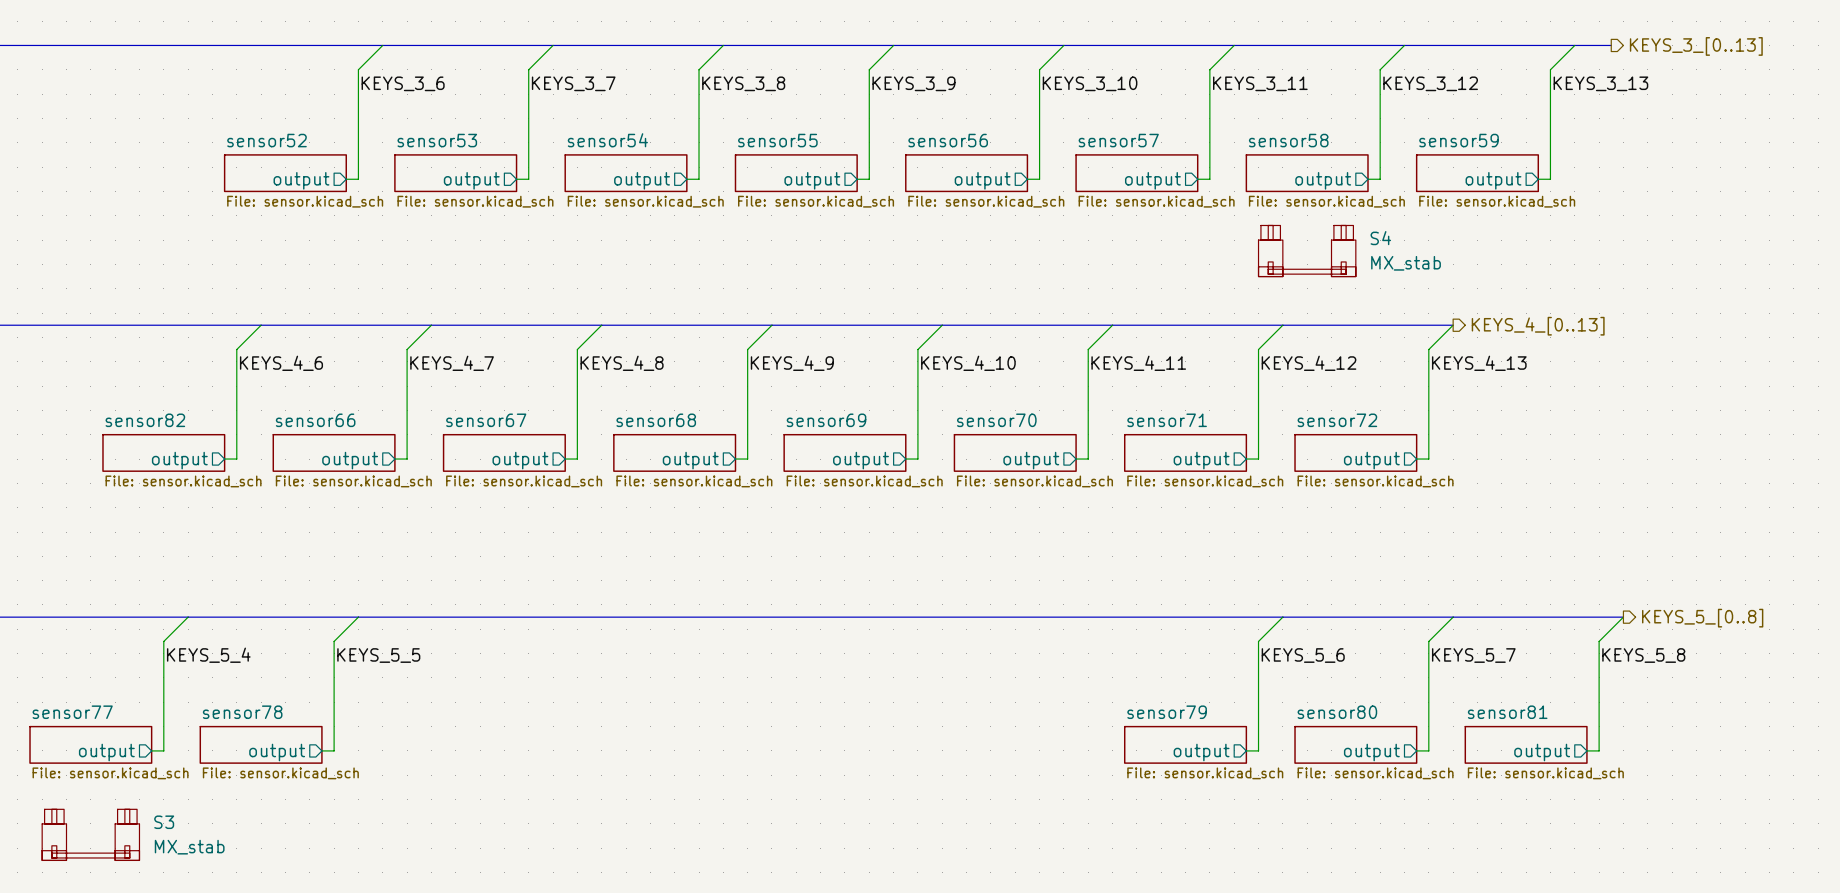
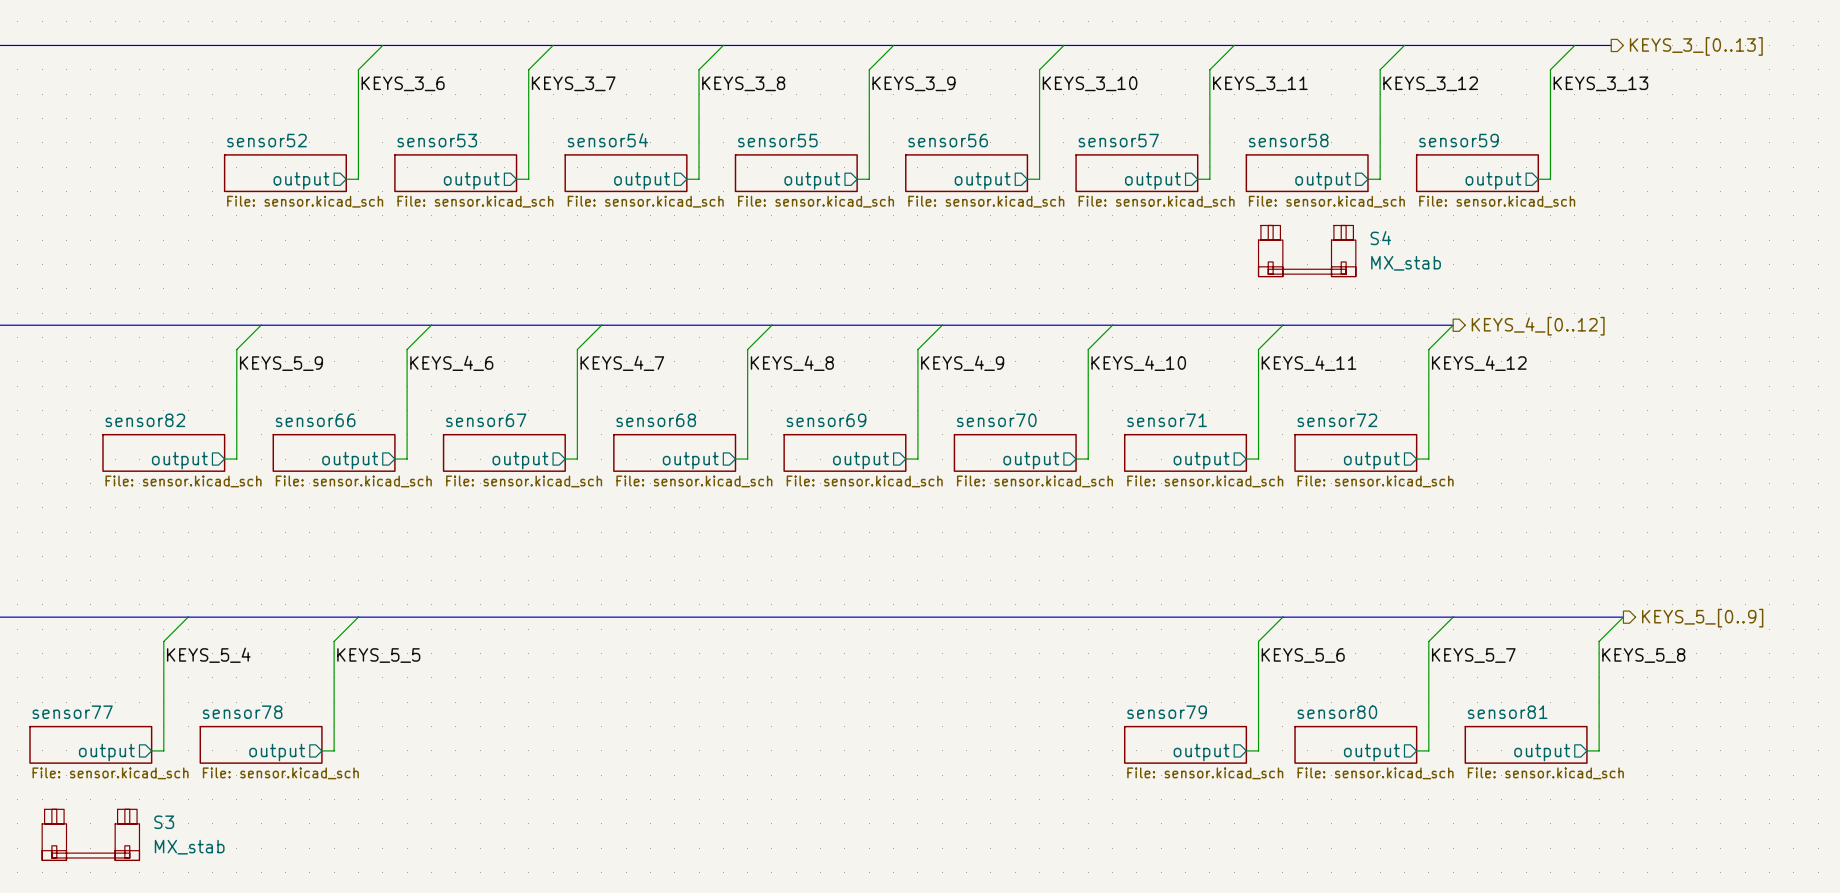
hierarchical label: KEYS_4_[0..13] (1538, 326) -> KEYS_4_[0..12] (1538, 326)
label: KEYS_4_6 (281, 363) -> KEYS_5_9 (281, 363)
label: KEYS_4_7 (452, 363) -> KEYS_4_6 (451, 363)
label: KEYS_4_8 (622, 363) -> KEYS_4_7 (622, 363)
label: KEYS_4_9 (792, 363) -> KEYS_4_8 (792, 363)
label: KEYS_4_10 (968, 363) -> KEYS_4_9 (962, 363)
label: KEYS_4_11 (1138, 363) -> KEYS_4_10 (1138, 363)
label: KEYS_4_12 (1309, 363) -> KEYS_4_11 (1309, 363)
label: KEYS_4_13 (1479, 363) -> KEYS_4_12 (1479, 363)
hierarchical label: KEYS_5_[0..8] (1702, 618) -> KEYS_5_[0..9] (1702, 618)

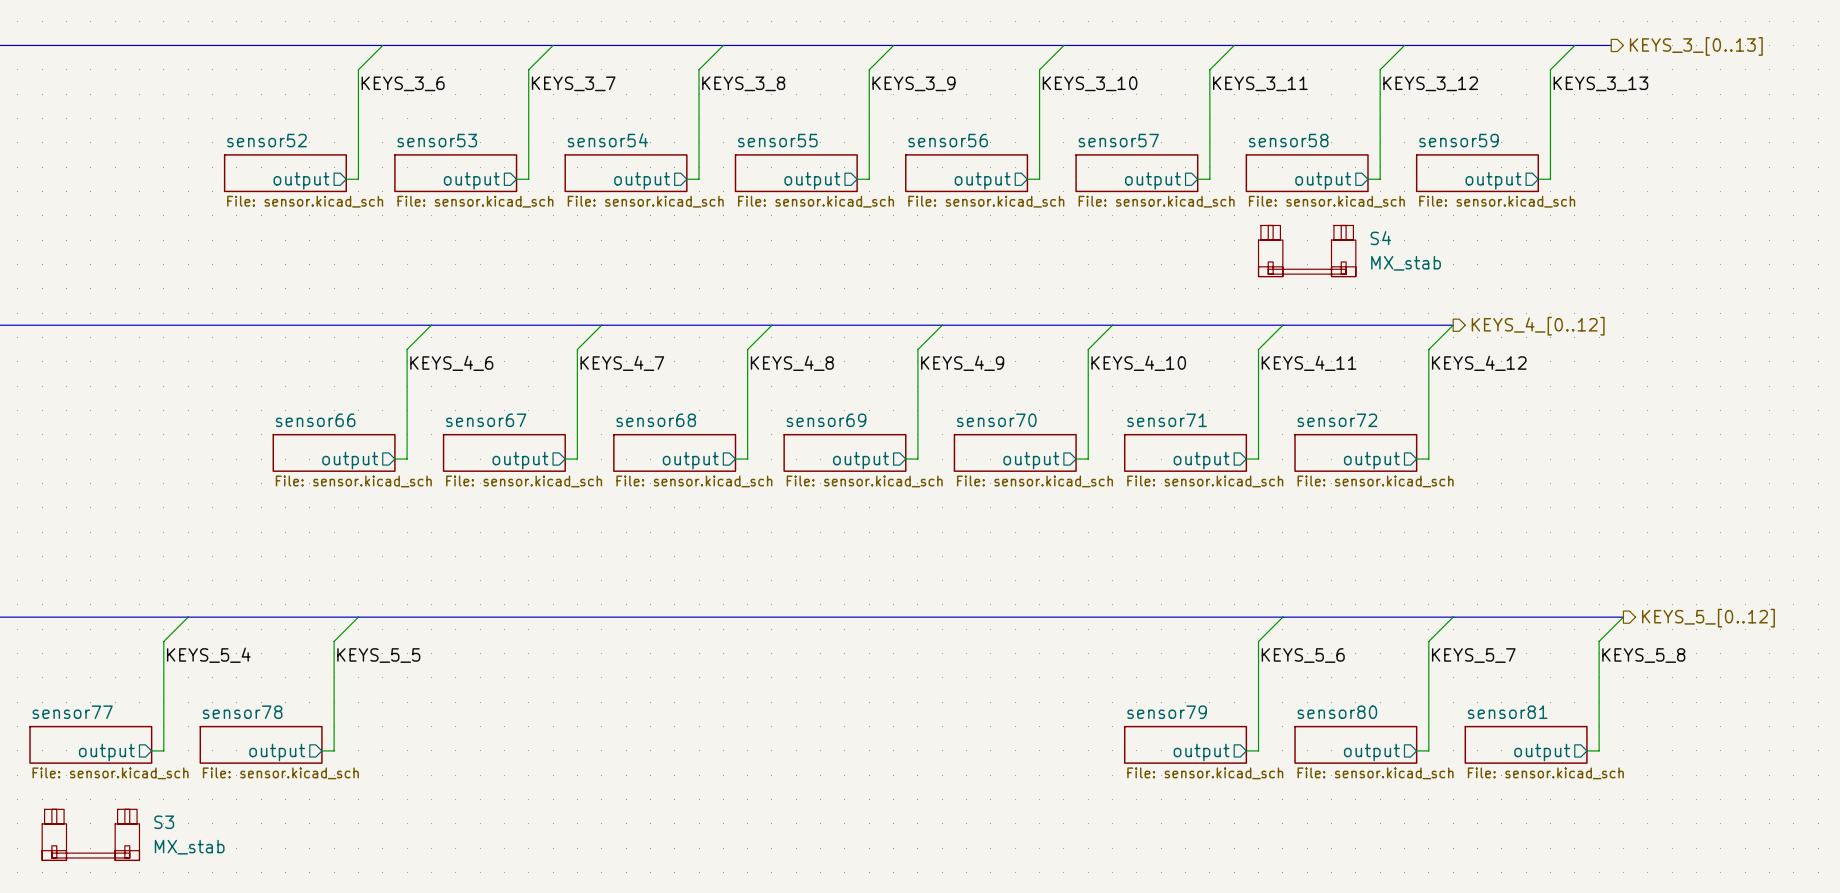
wire: (261, 325) (236, 349) (236, 459) (224, 459) -> none
label: KEYS_5_9 (281, 363) -> none
sheet sensor82: File: sensor.kicad_sch (163, 452) -> none
sheet pin: output (179, 460) -> none
hierarchical label: KEYS_5_[0..9] (1702, 618) -> KEYS_5_[0..12] (1708, 618)

